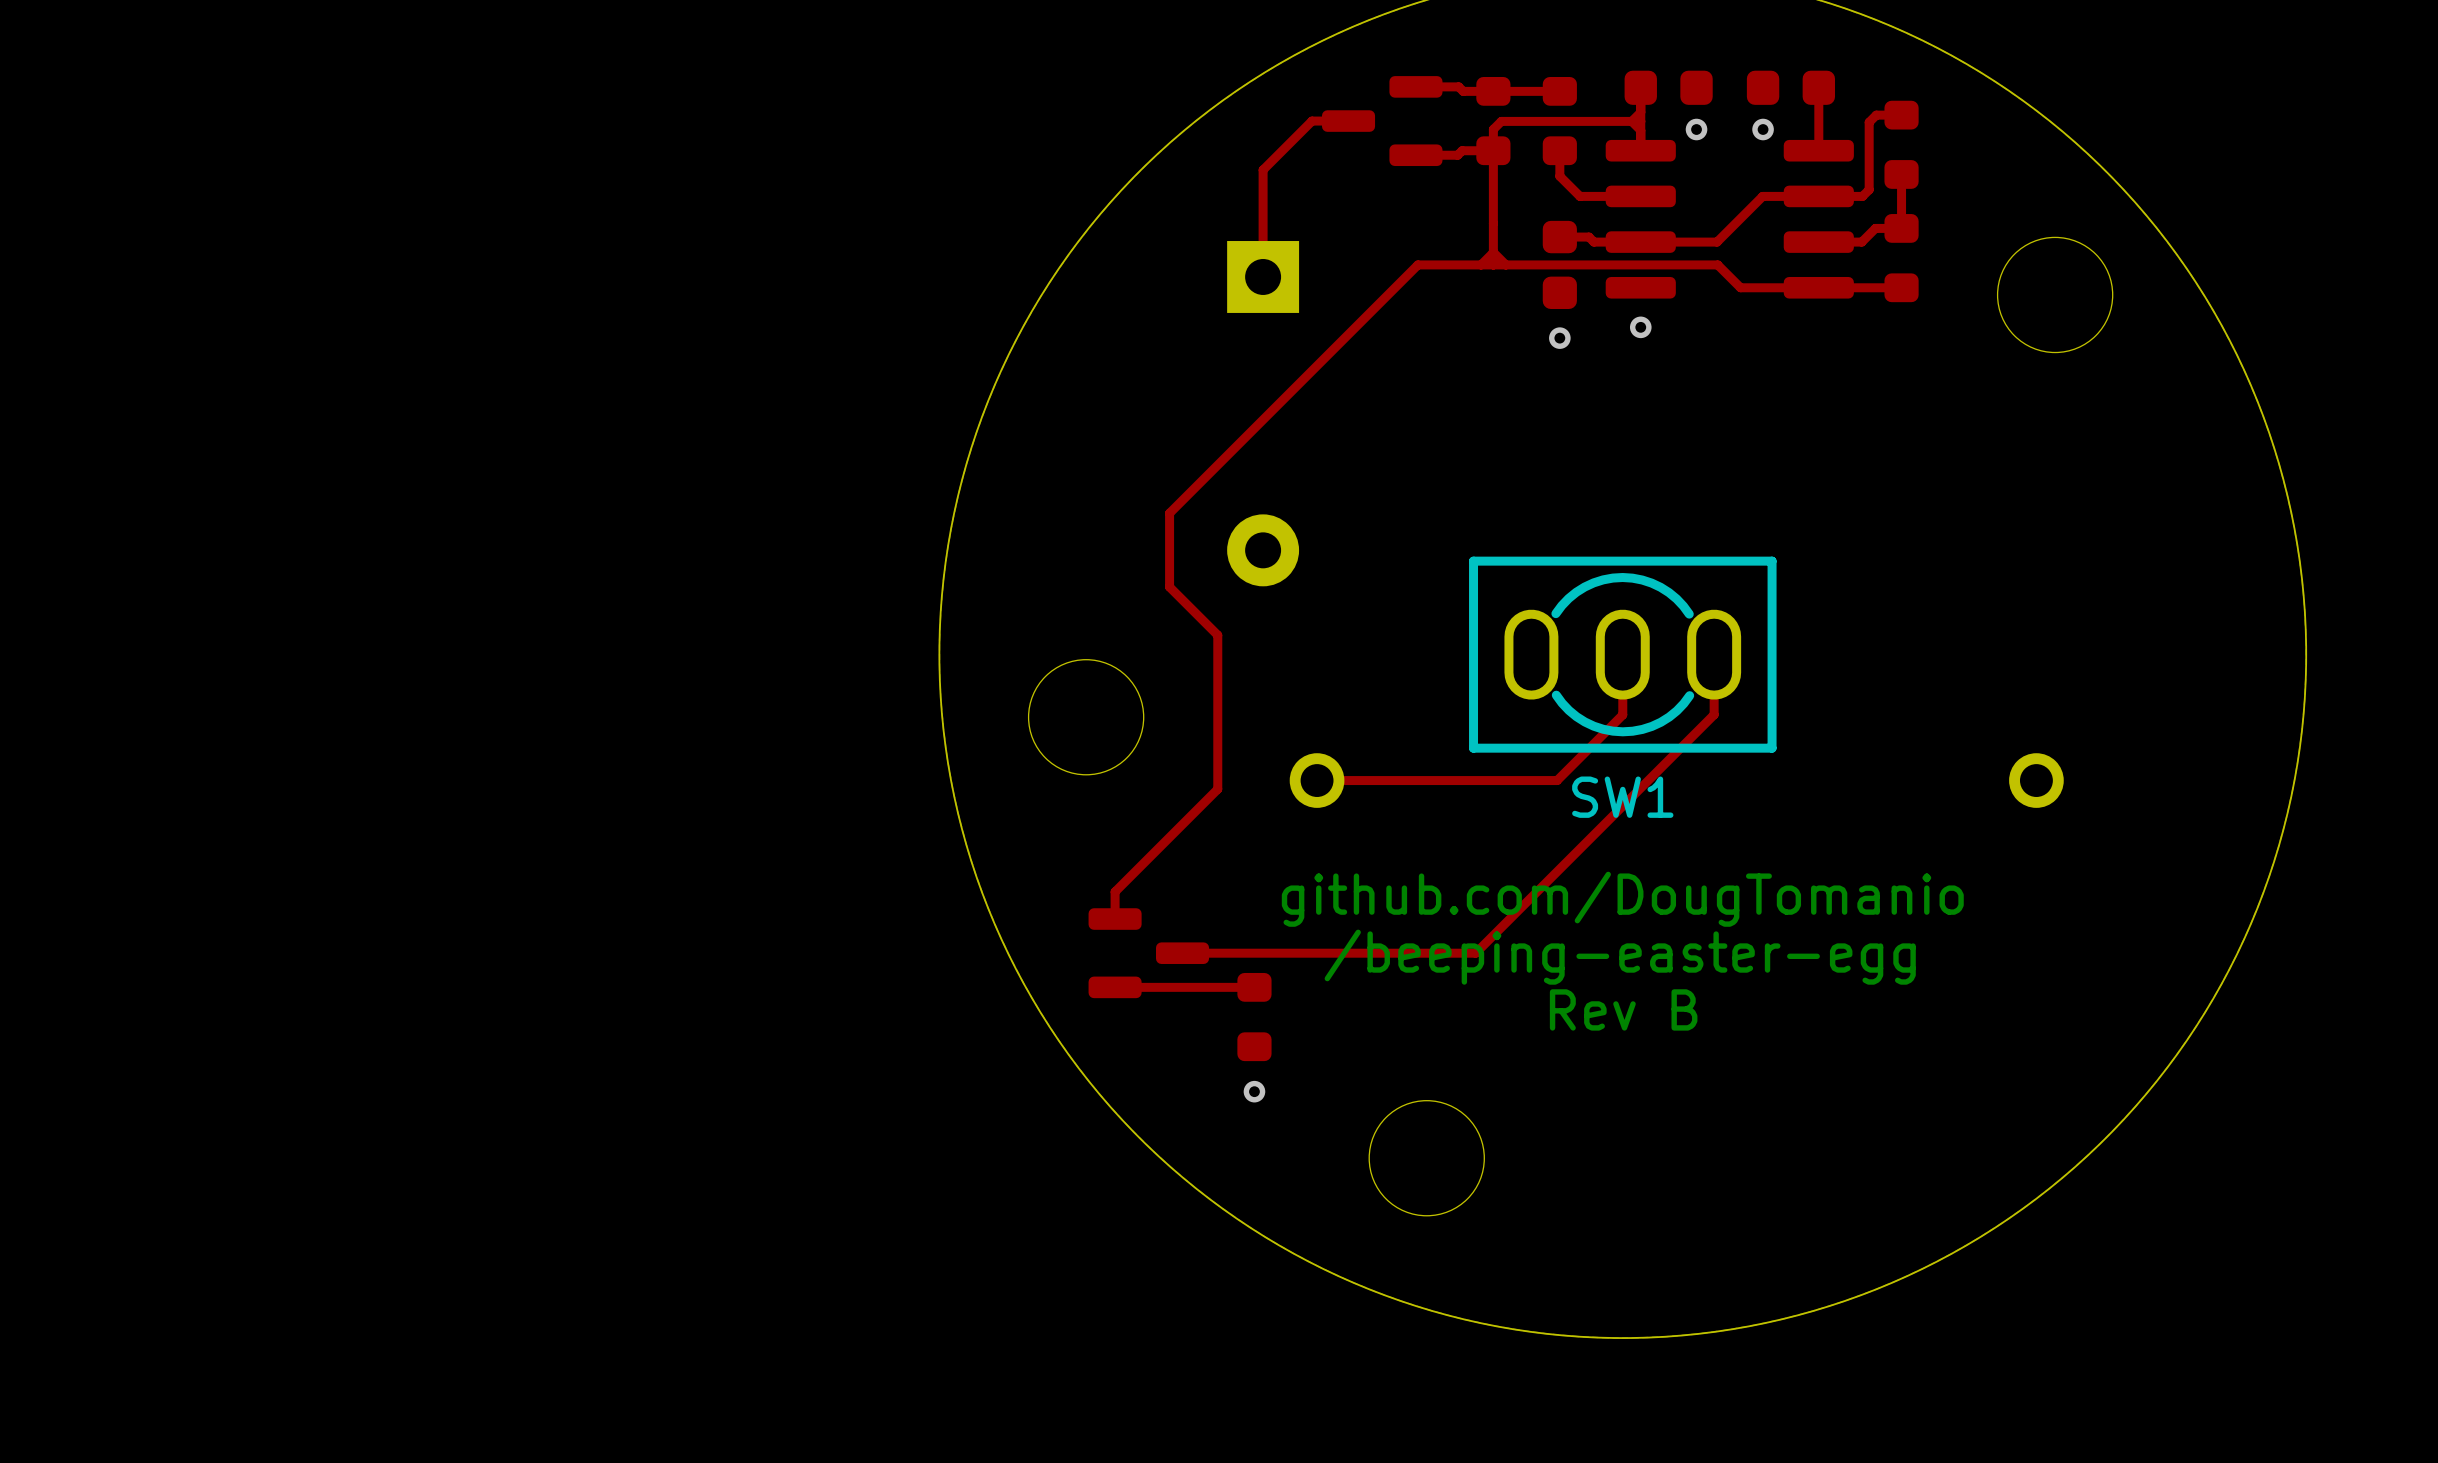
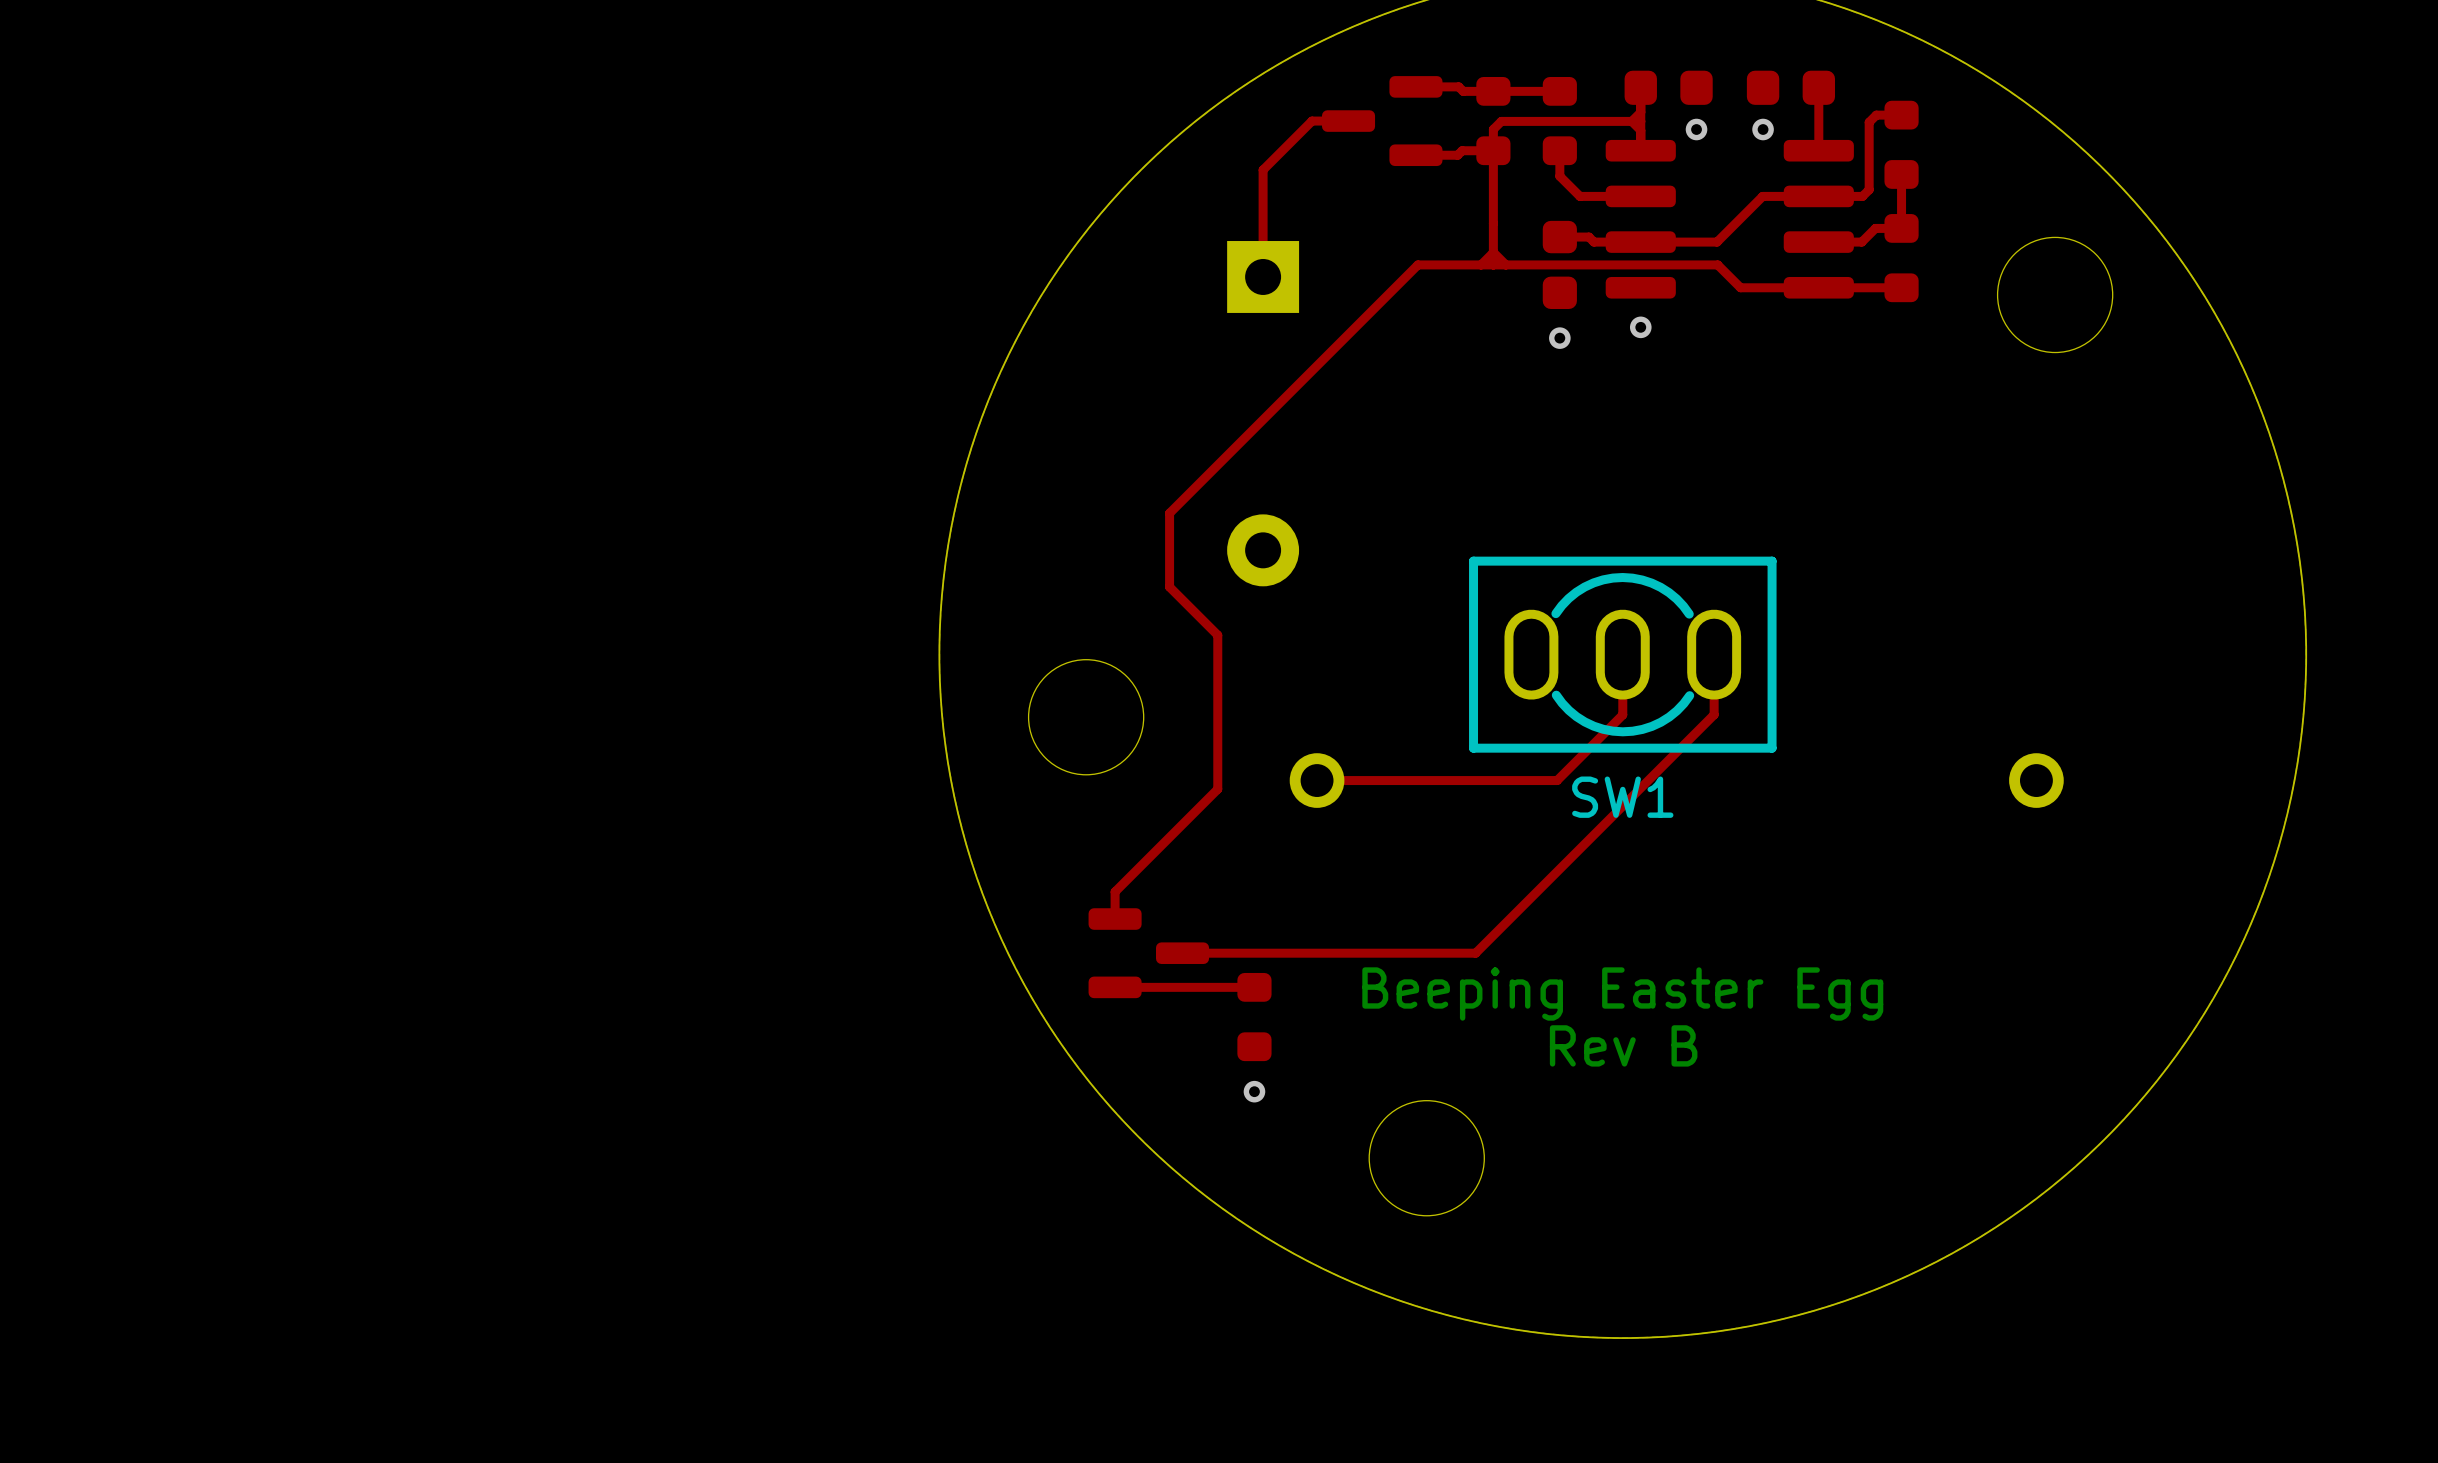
text: github.com/DougTomanio (1622, 899) -> none
text: /beeping-easter-egg (1620, 957) -> Beeping Easter Egg (1622, 993)
text position: Rev B (1623, 1009) -> Rev B (1623, 1045)

